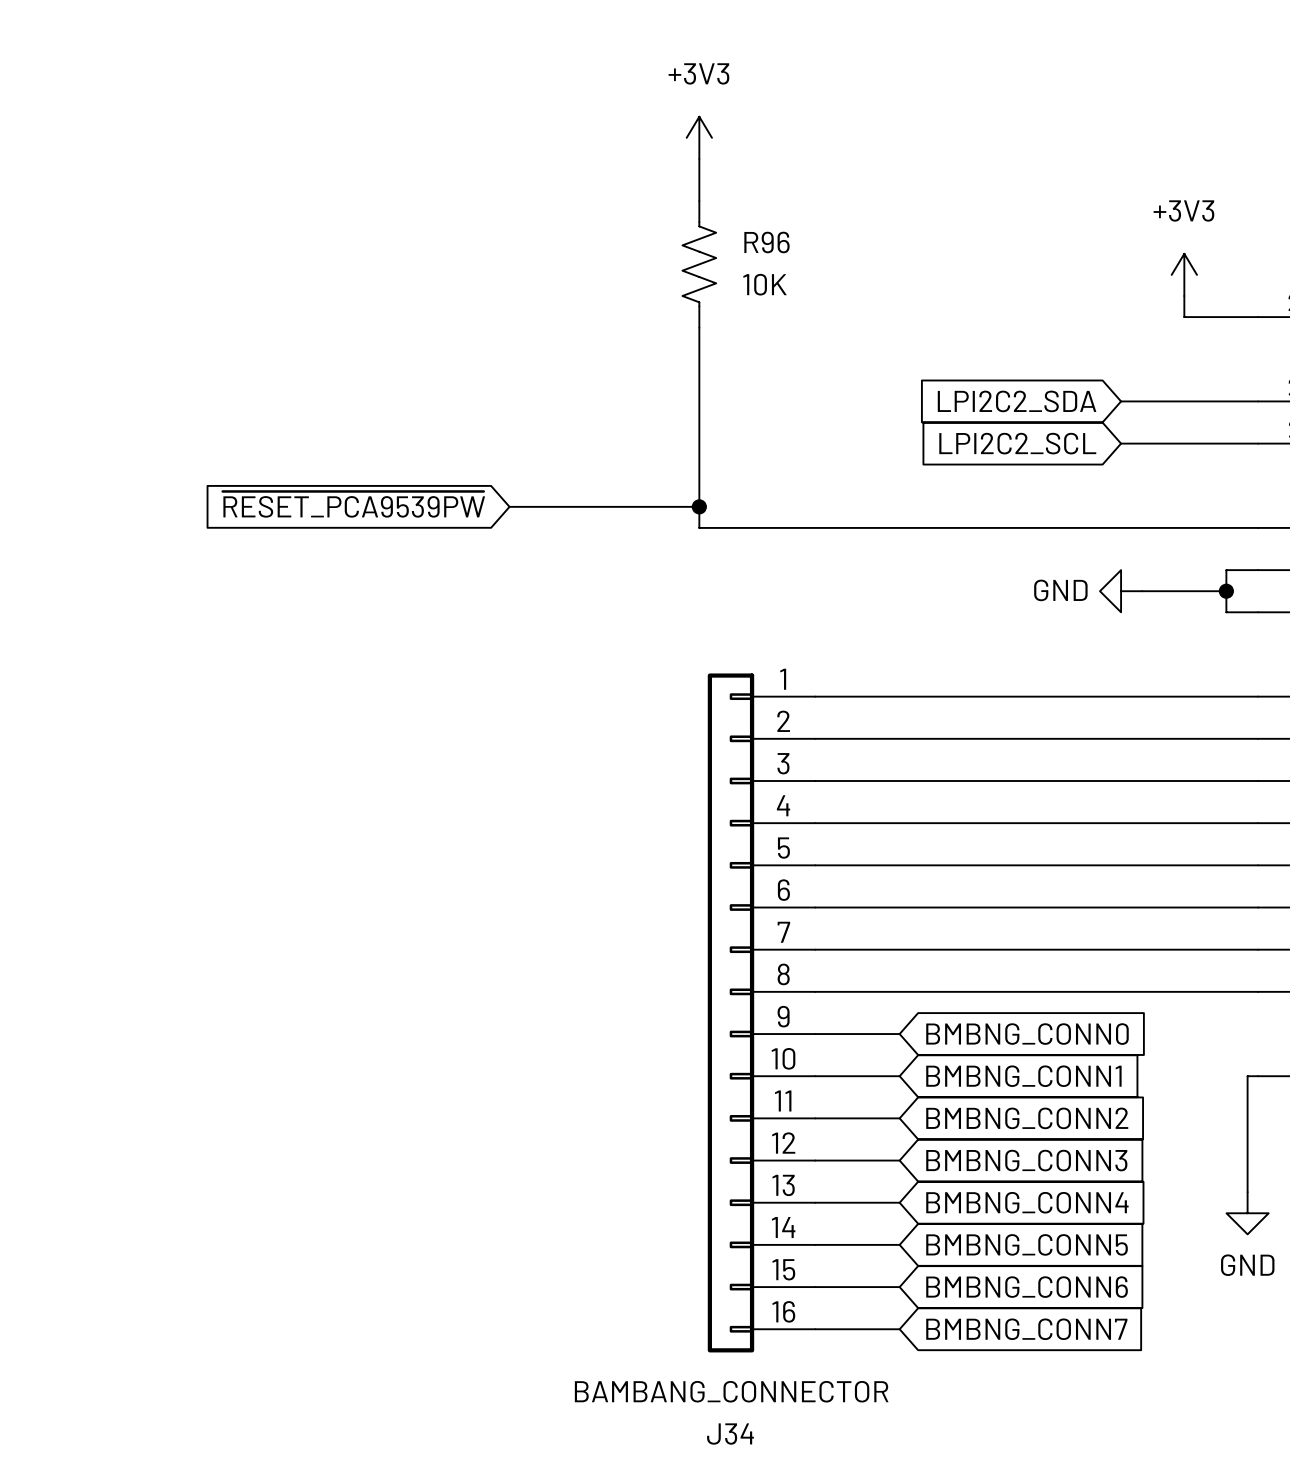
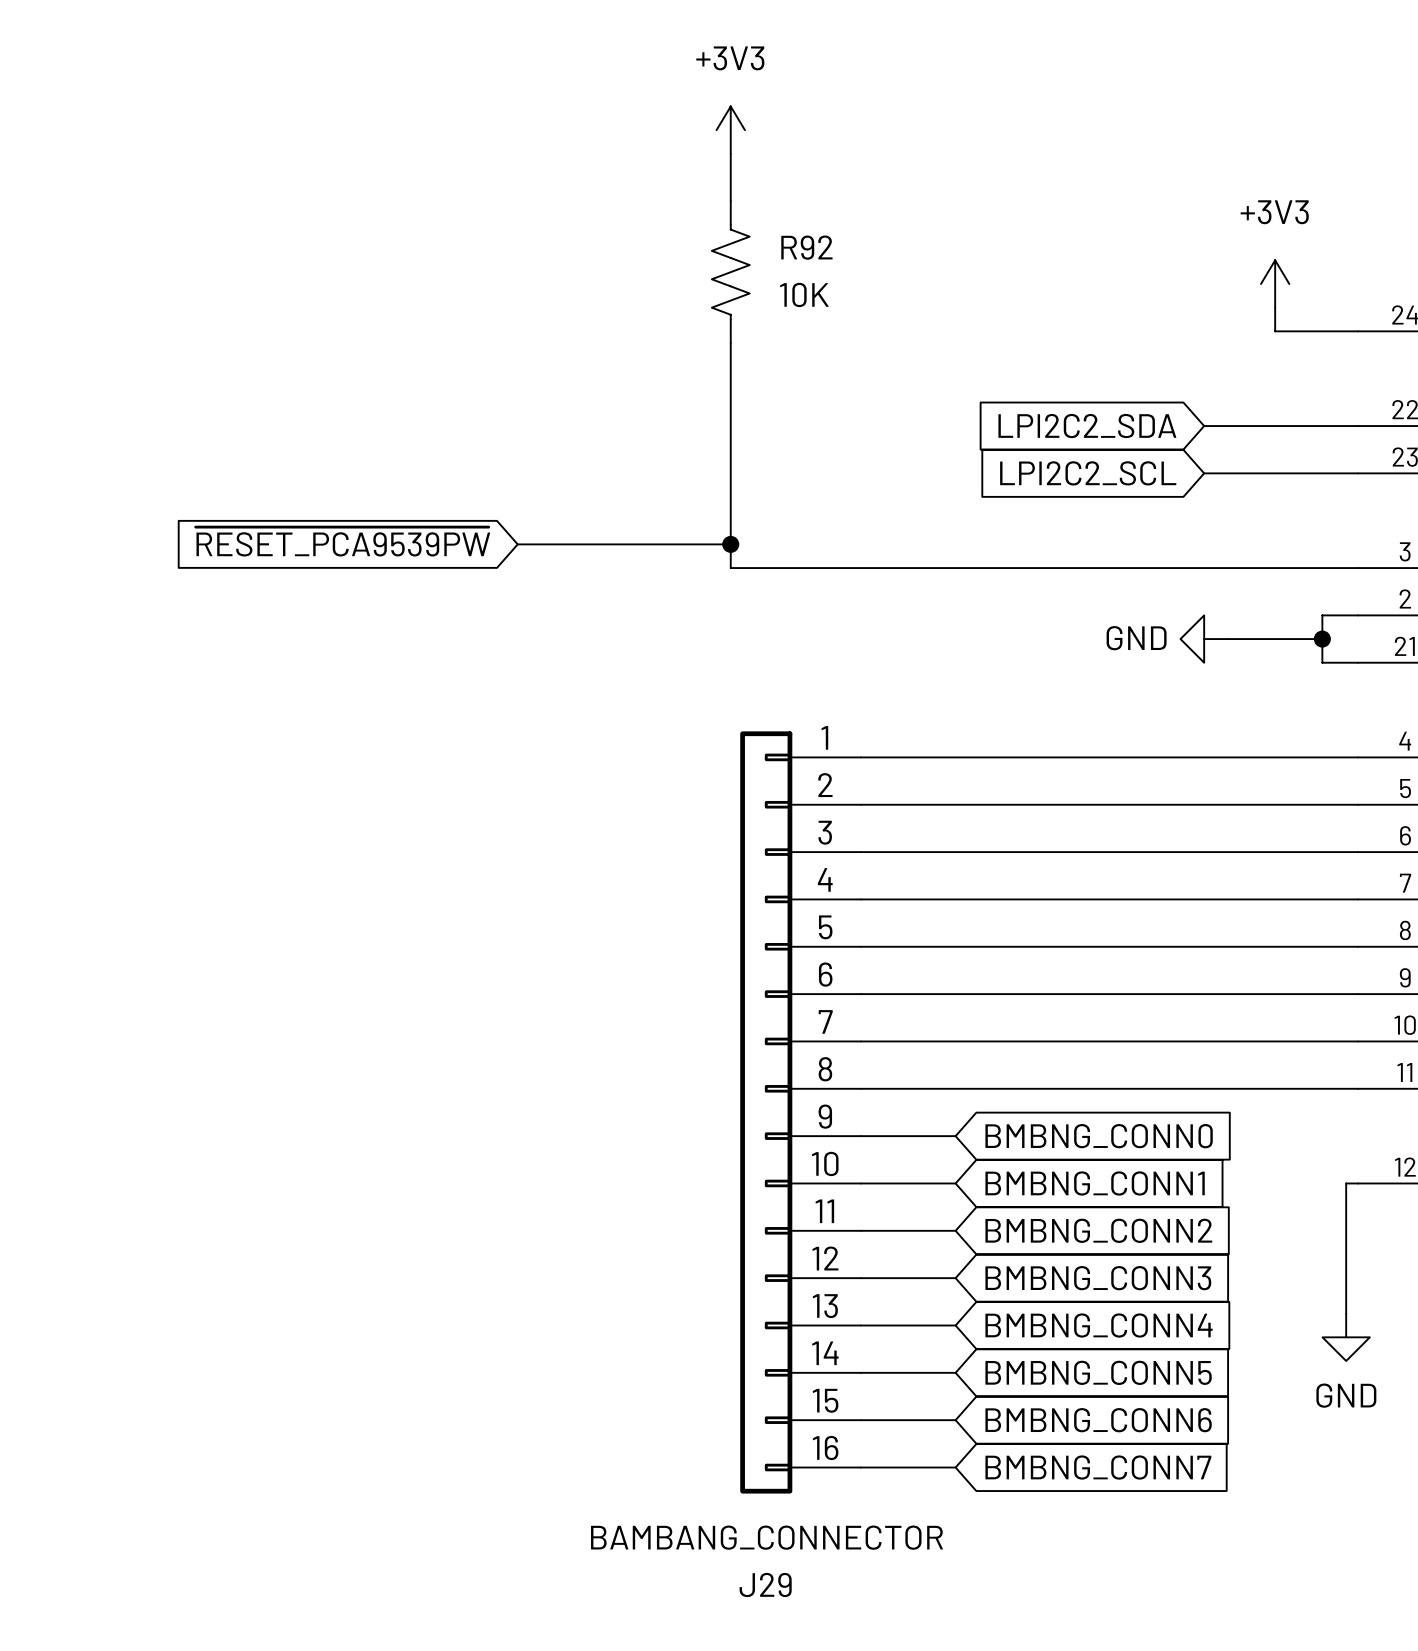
R96 name: R96 (767, 242) -> R92 (806, 247)
J34 name: J34 (730, 1434) -> J29 (765, 1584)

